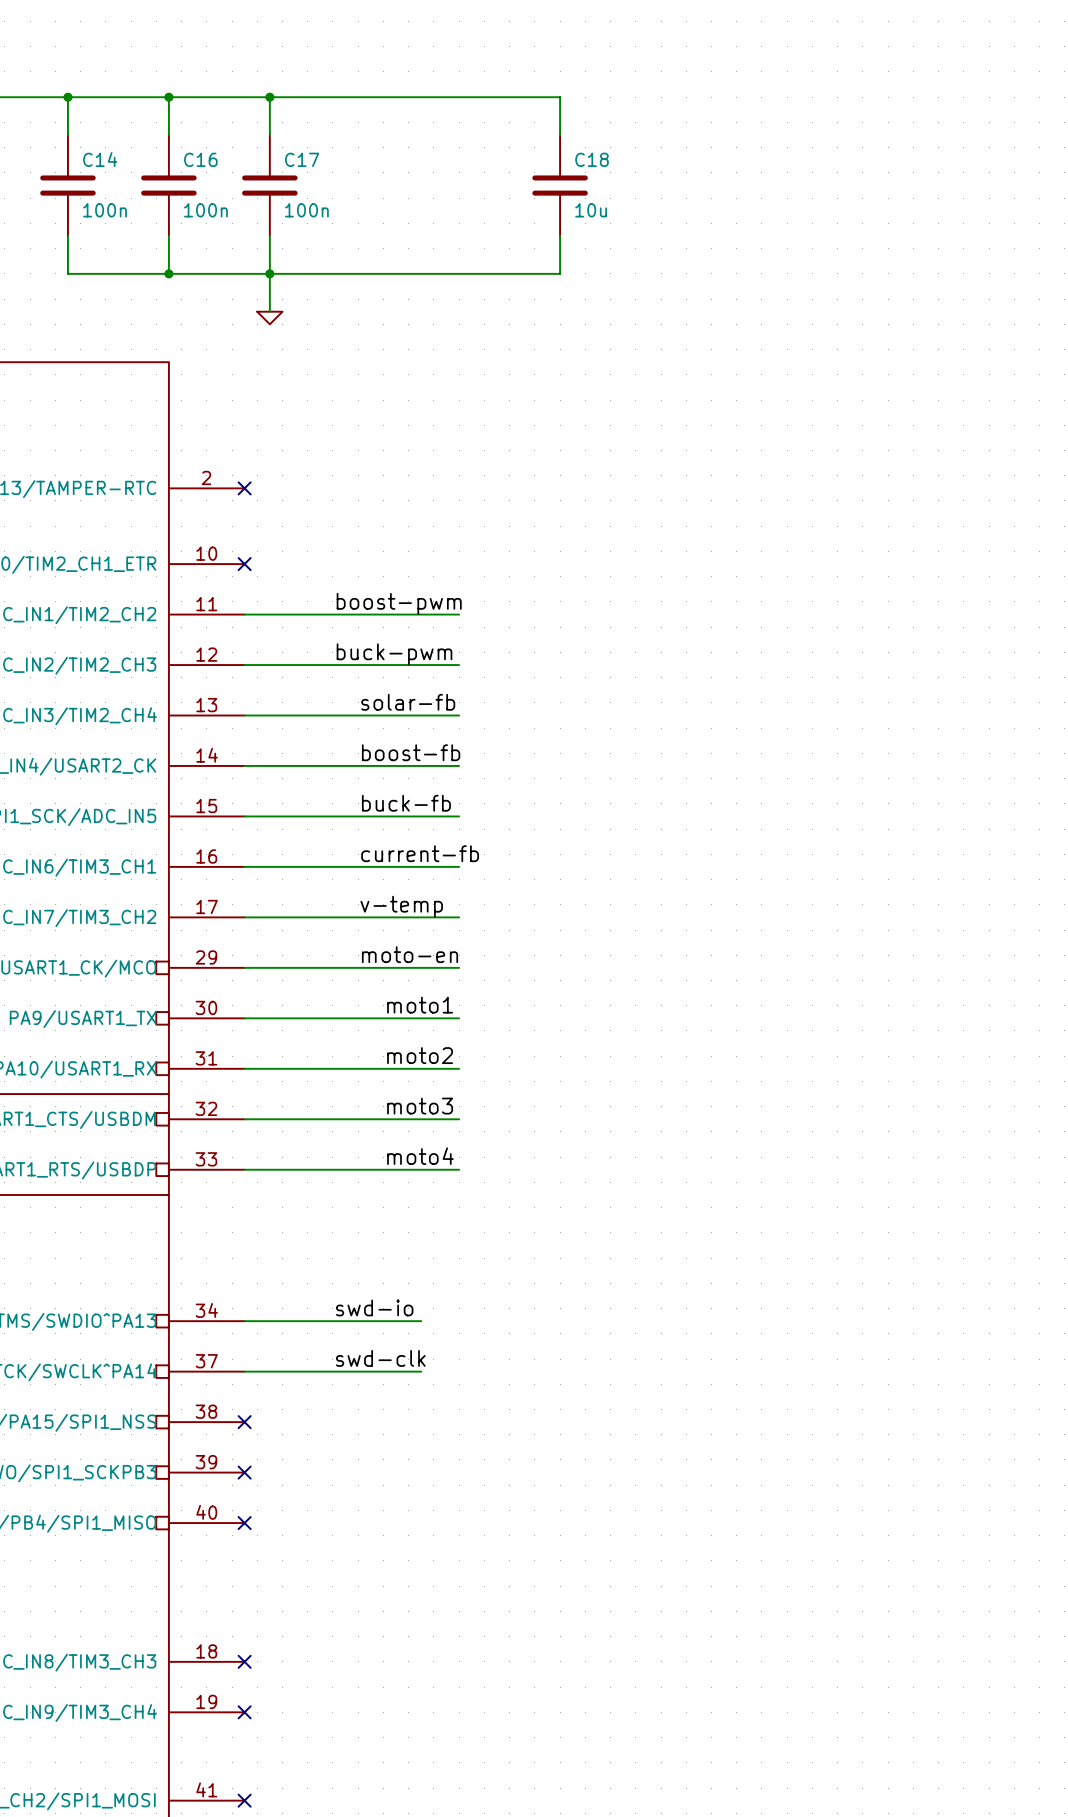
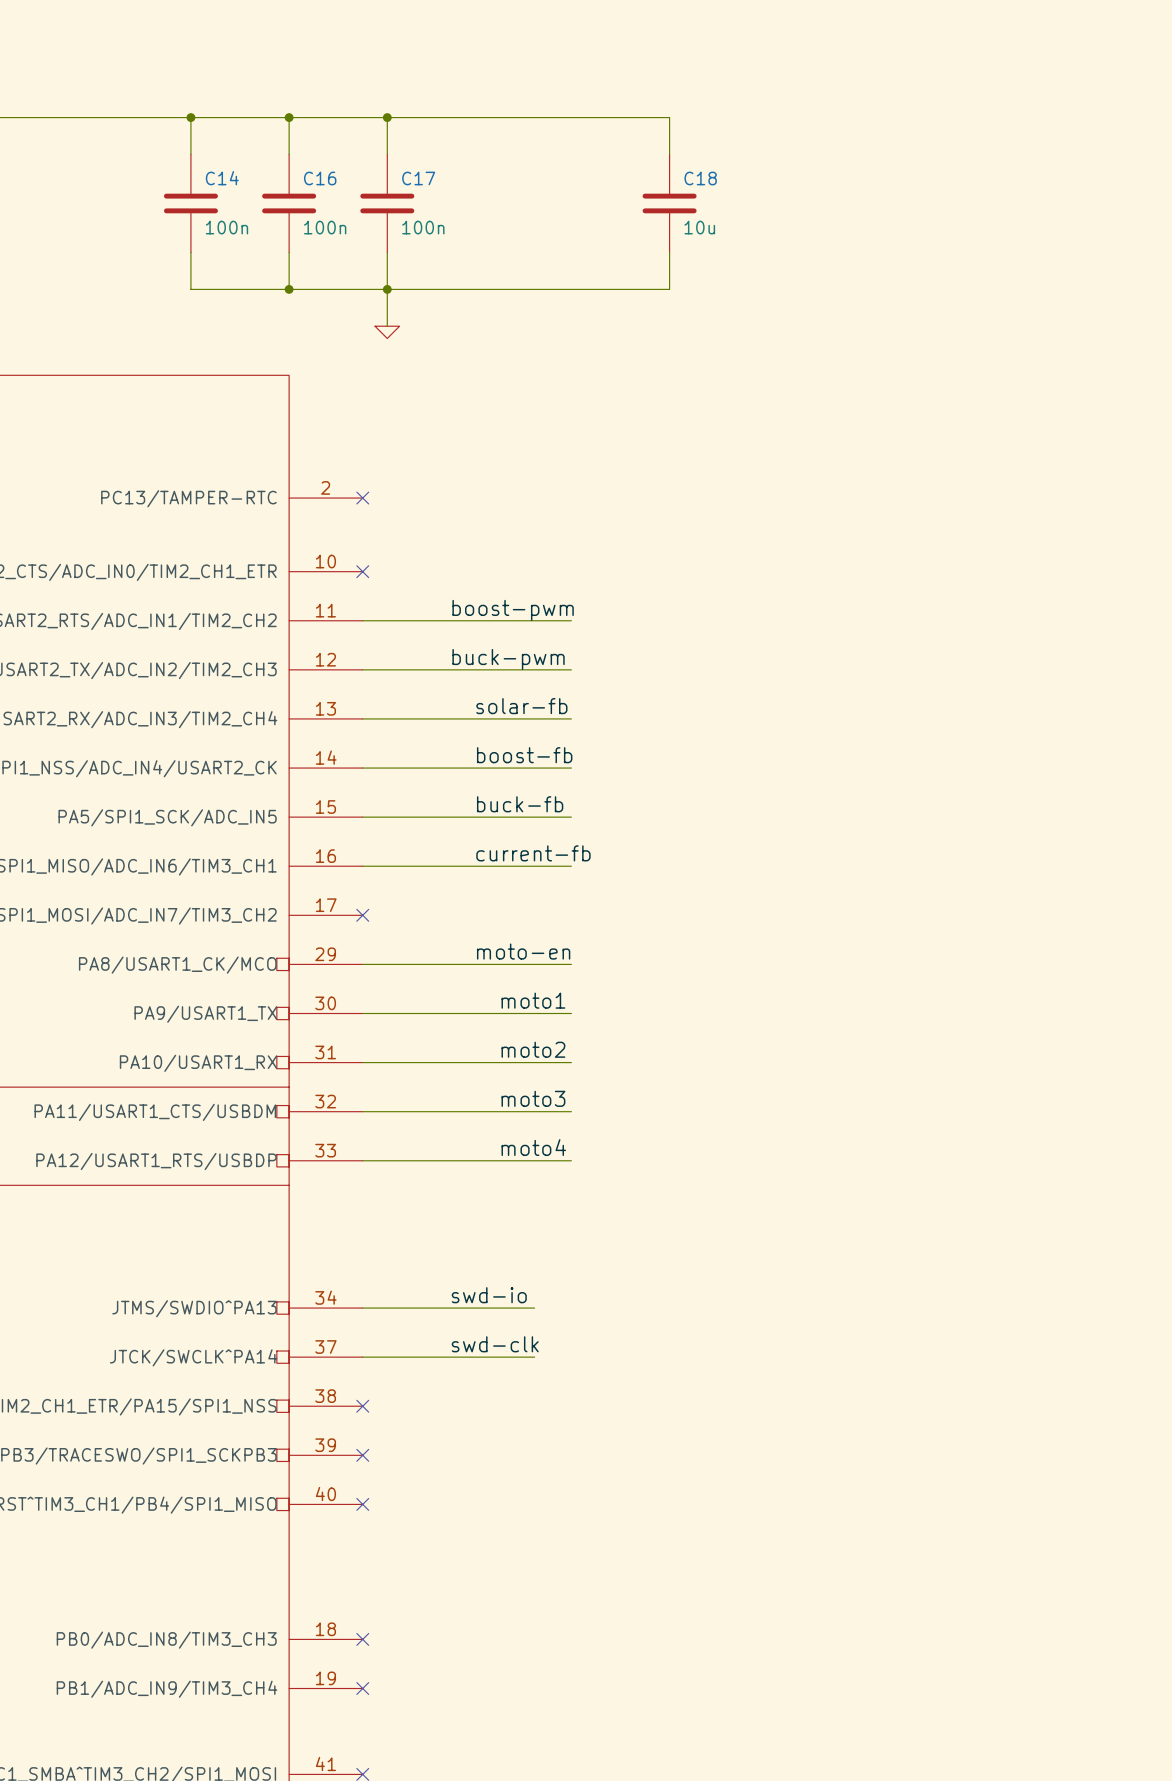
label: v-temp (401, 906) -> none
wire: (244, 917) (459, 917) -> none
no-connect mark: none -> (362, 915)

